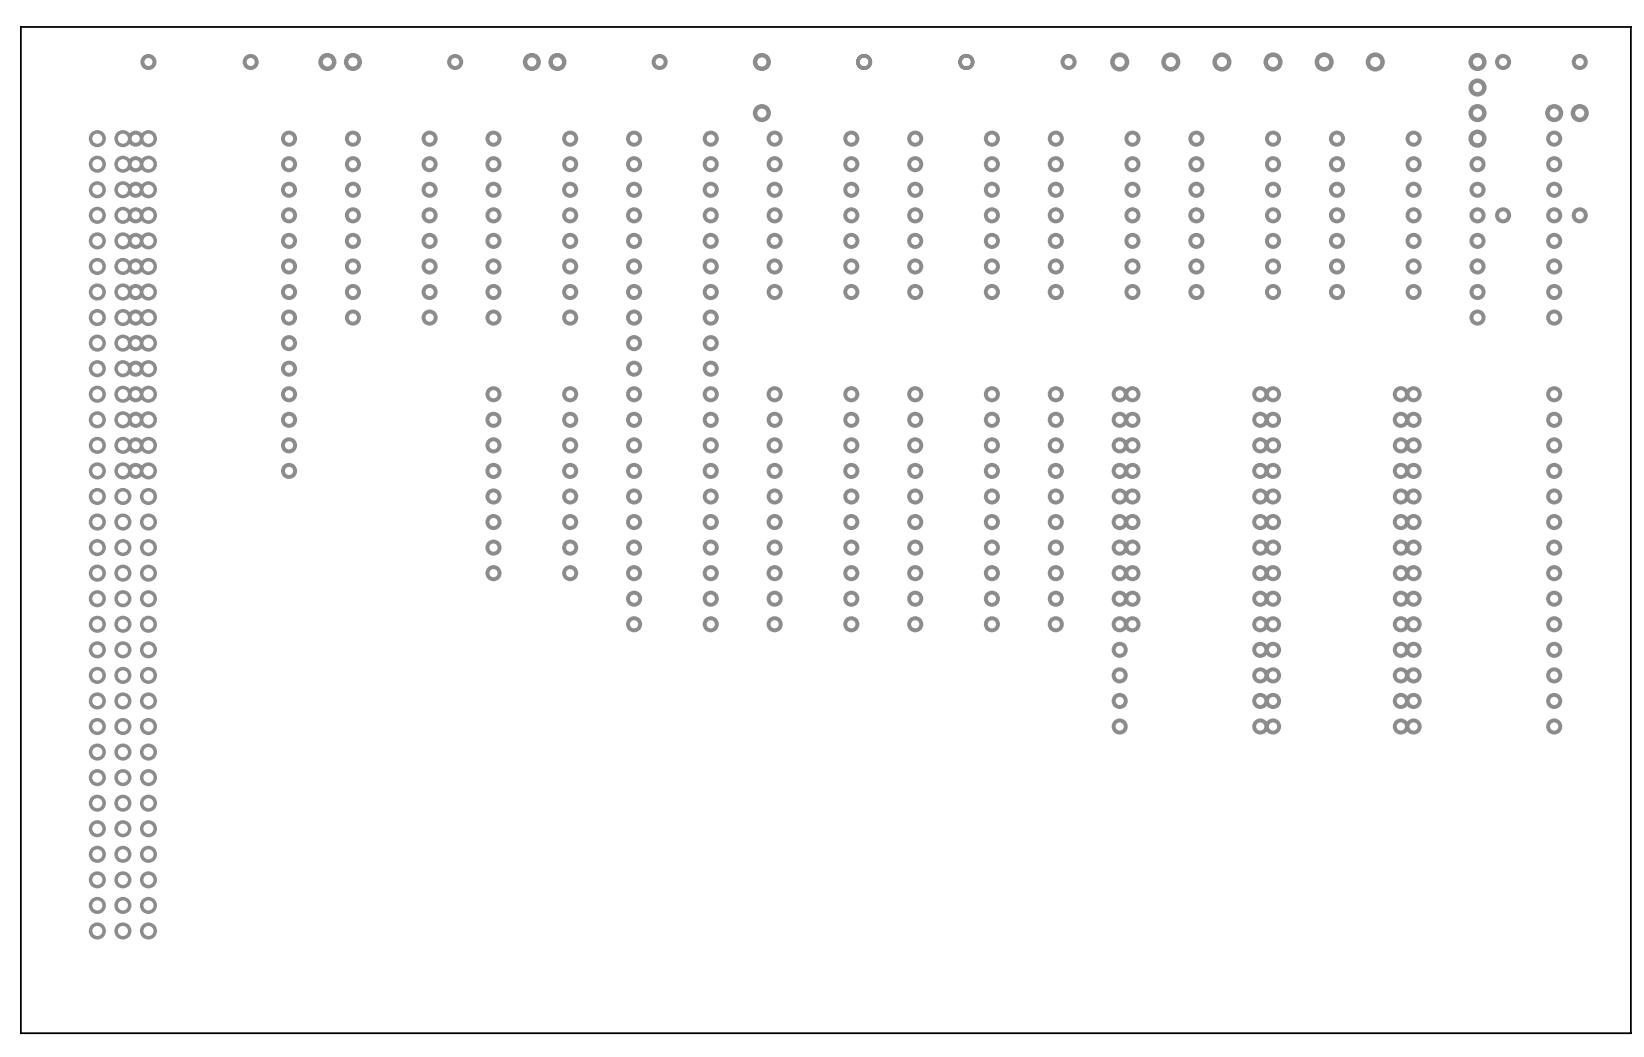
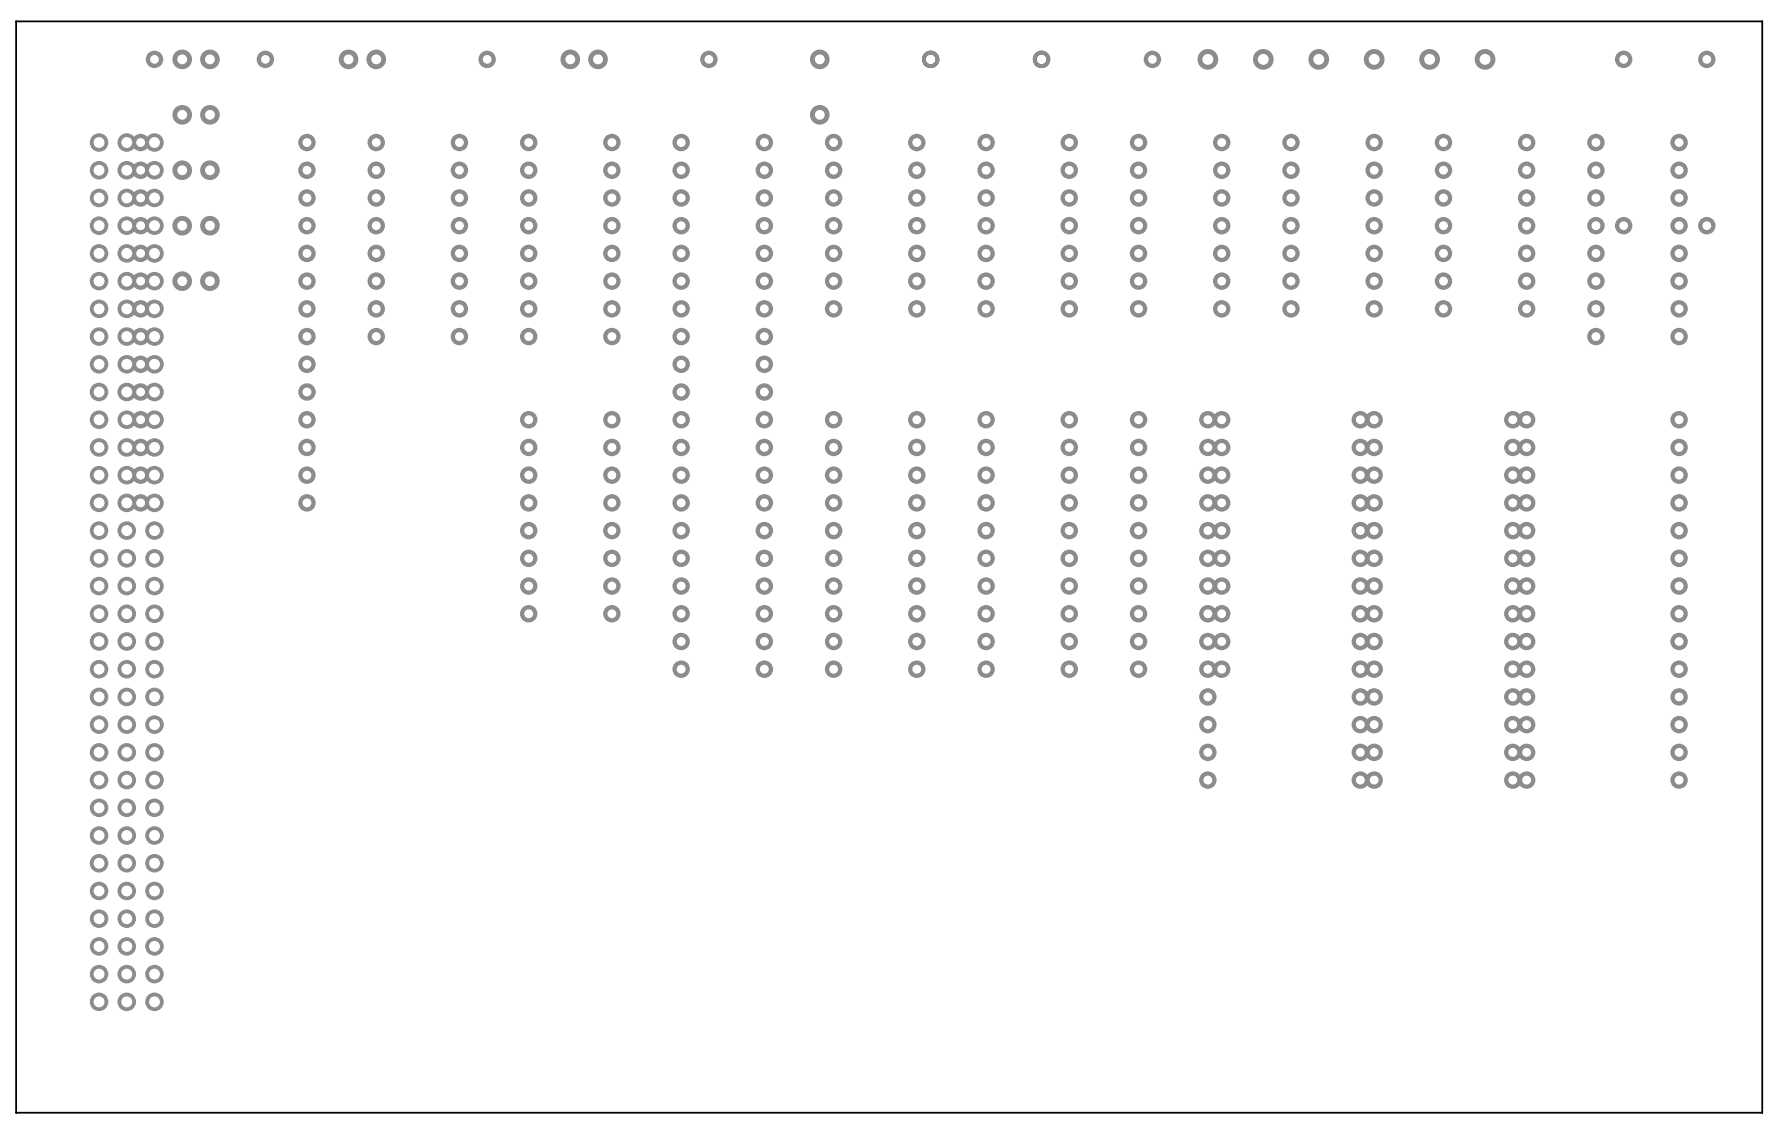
part: none -> (196, 59)
part: (1477, 100) -> none
part: none -> (196, 114)
part: (1566, 113) -> none
part: none -> (196, 170)
part: none -> (196, 225)
part: none -> (196, 281)

